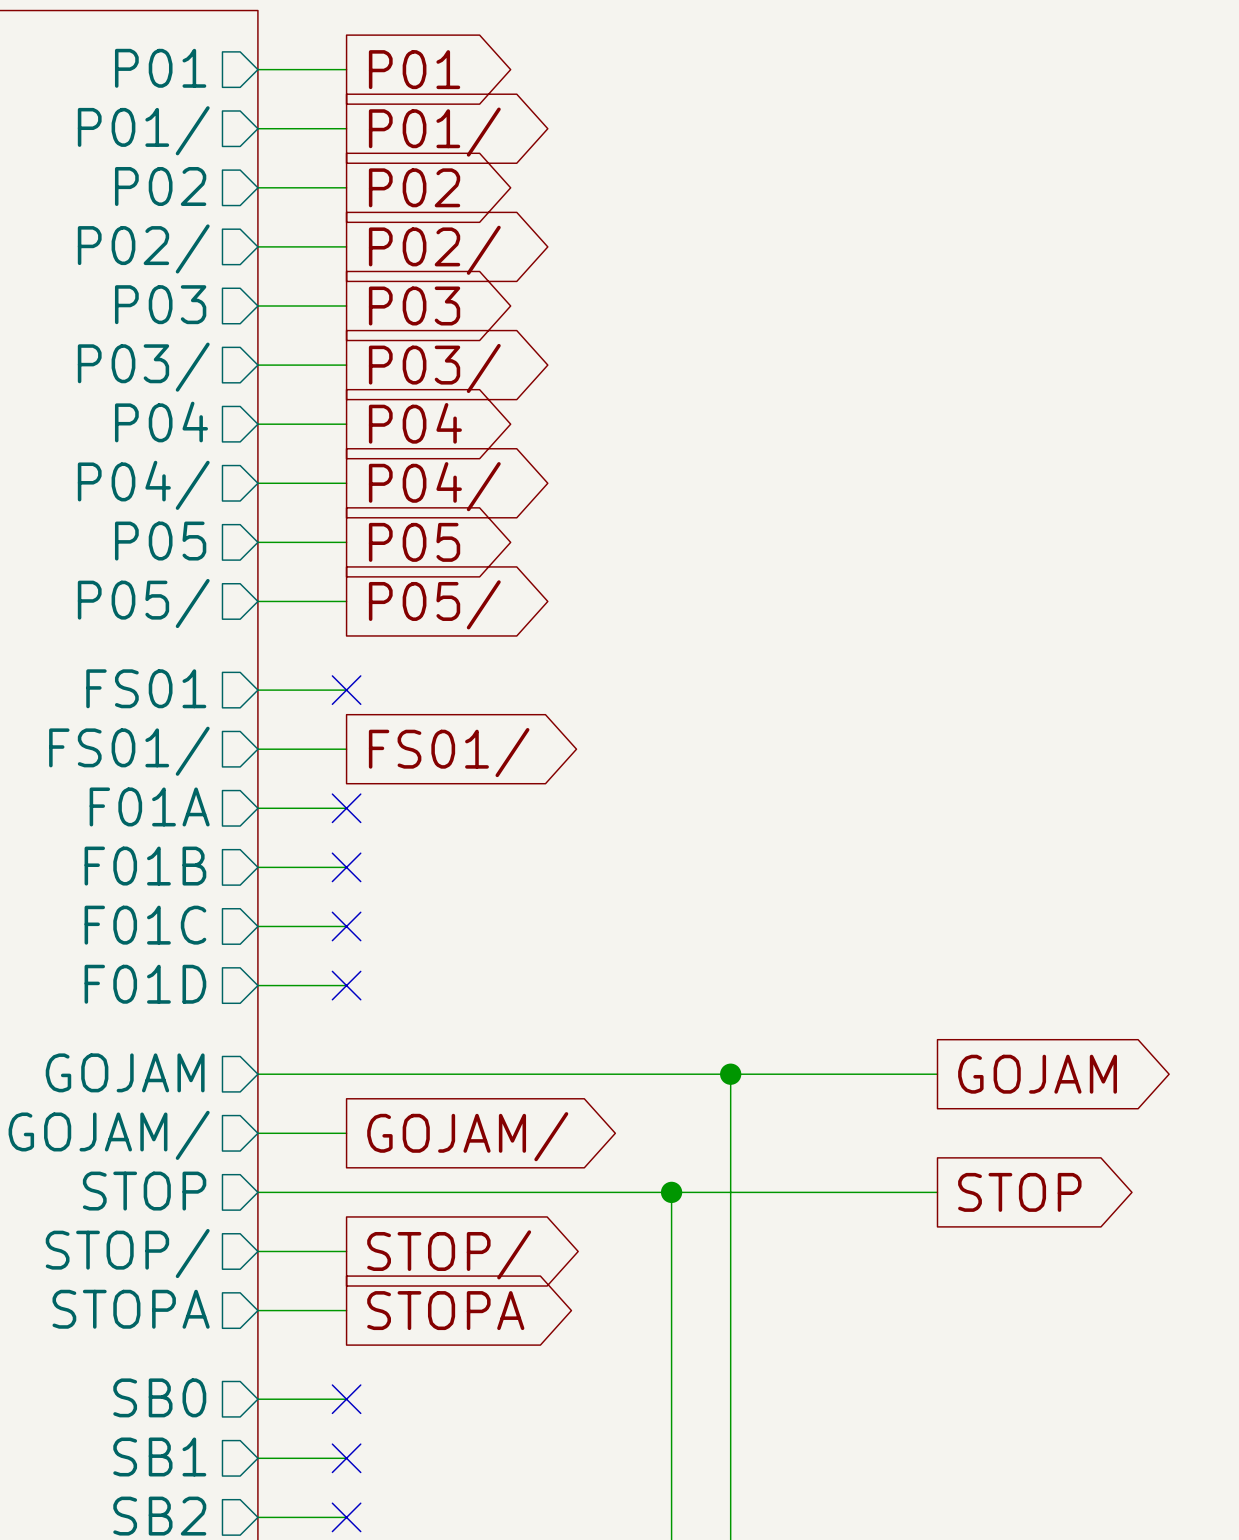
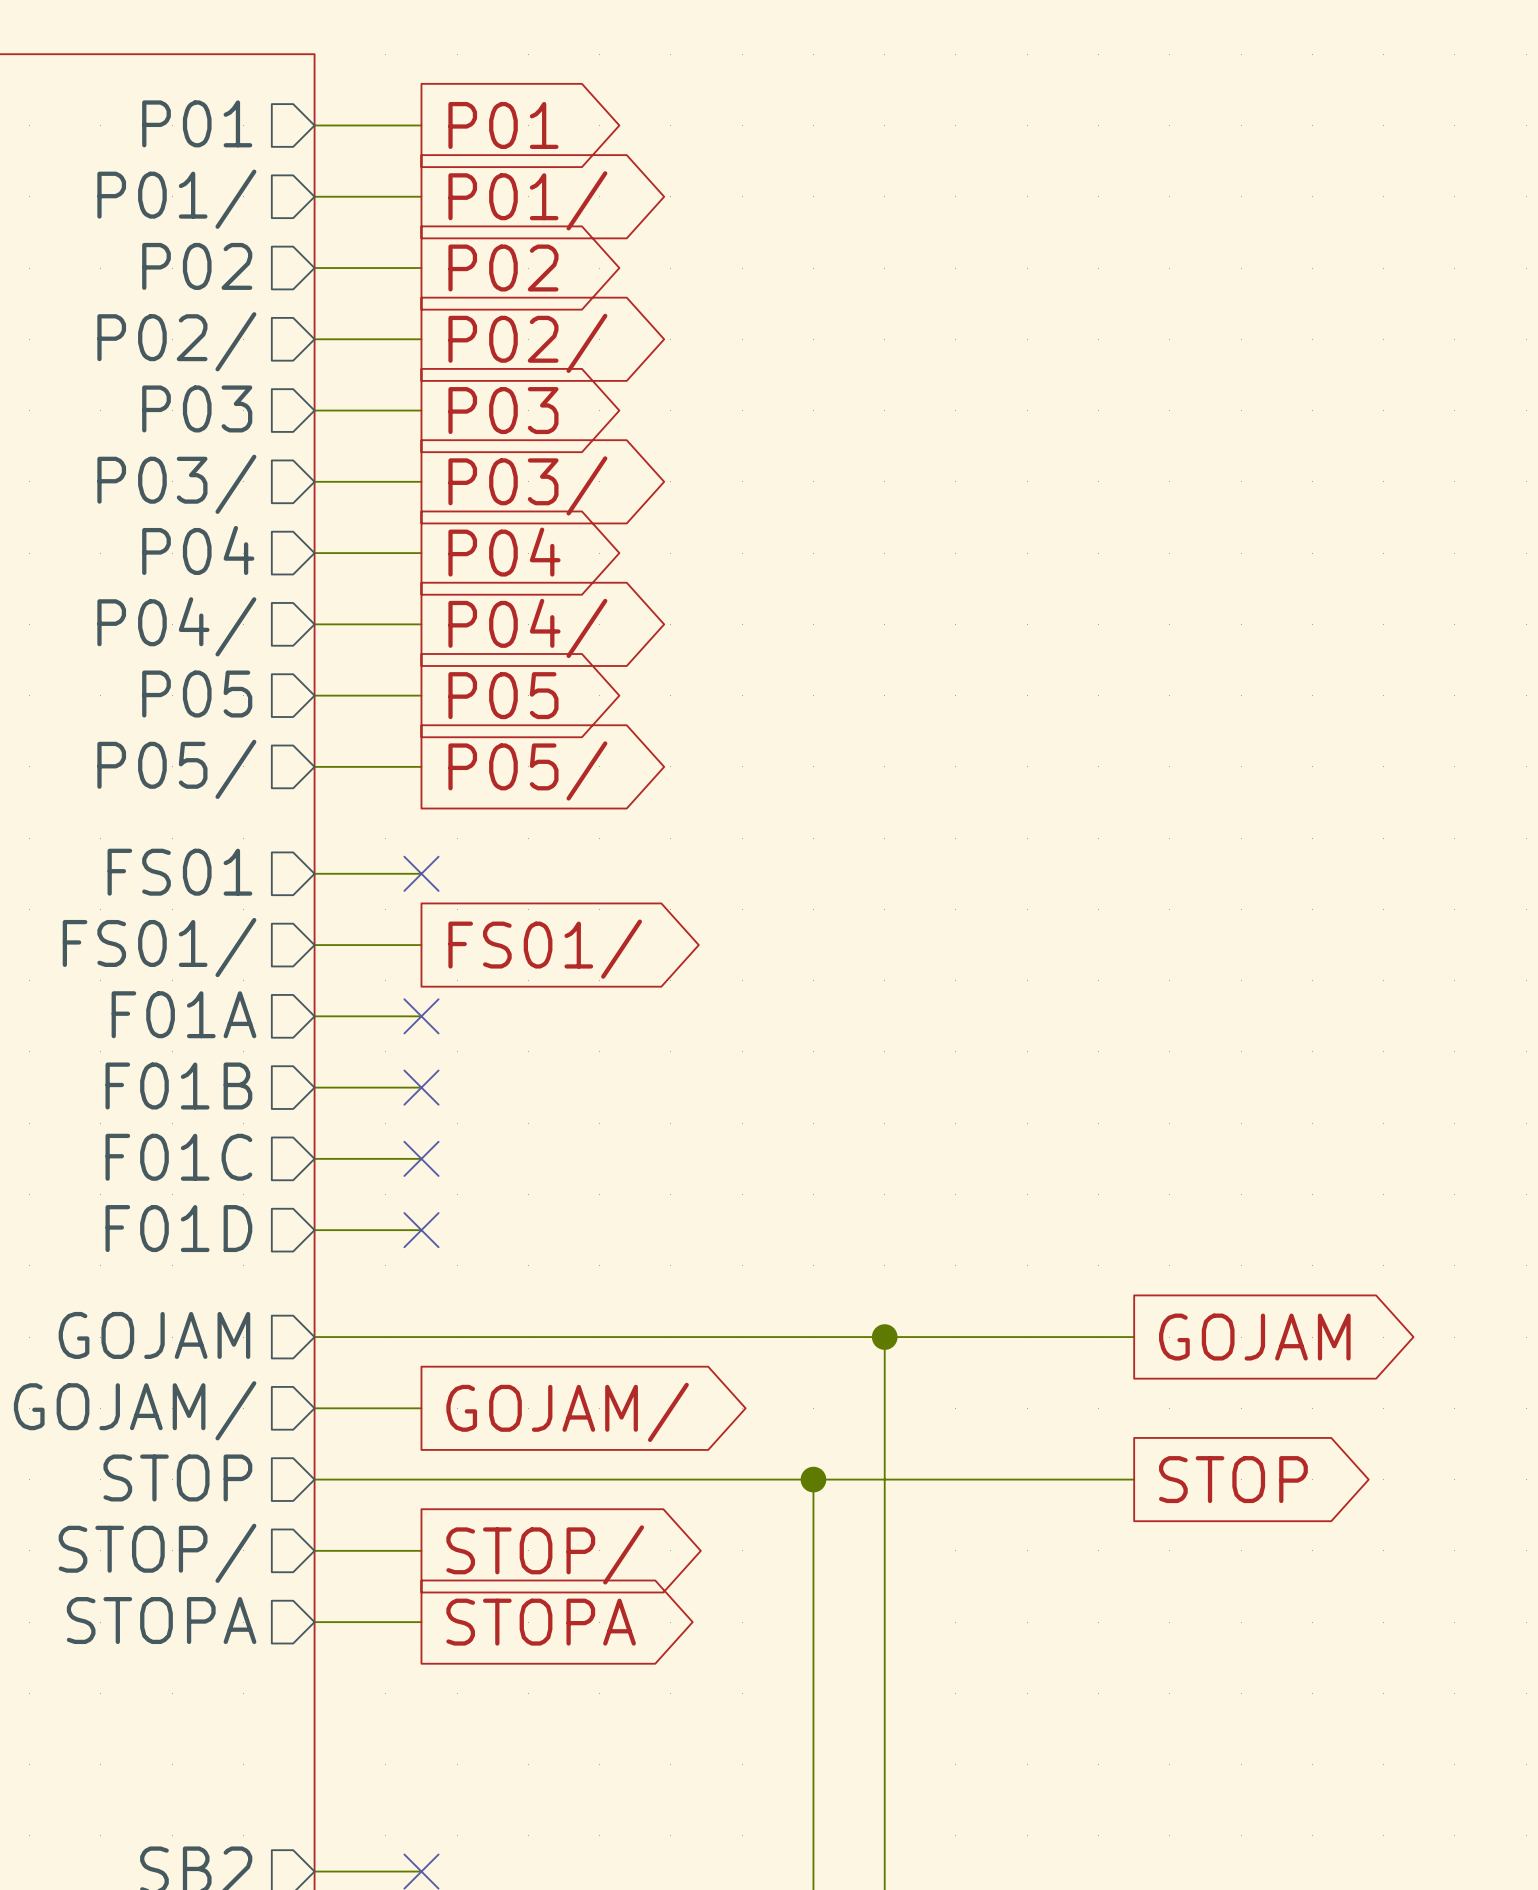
sheet pin: SB0 (159, 1397) -> none
wire: (257, 1399) (346, 1399) -> none
no-connect mark: (346, 1399) -> none
sheet pin: SB1 (159, 1456) -> none
wire: (257, 1458) (346, 1458) -> none
no-connect mark: (346, 1458) -> none

